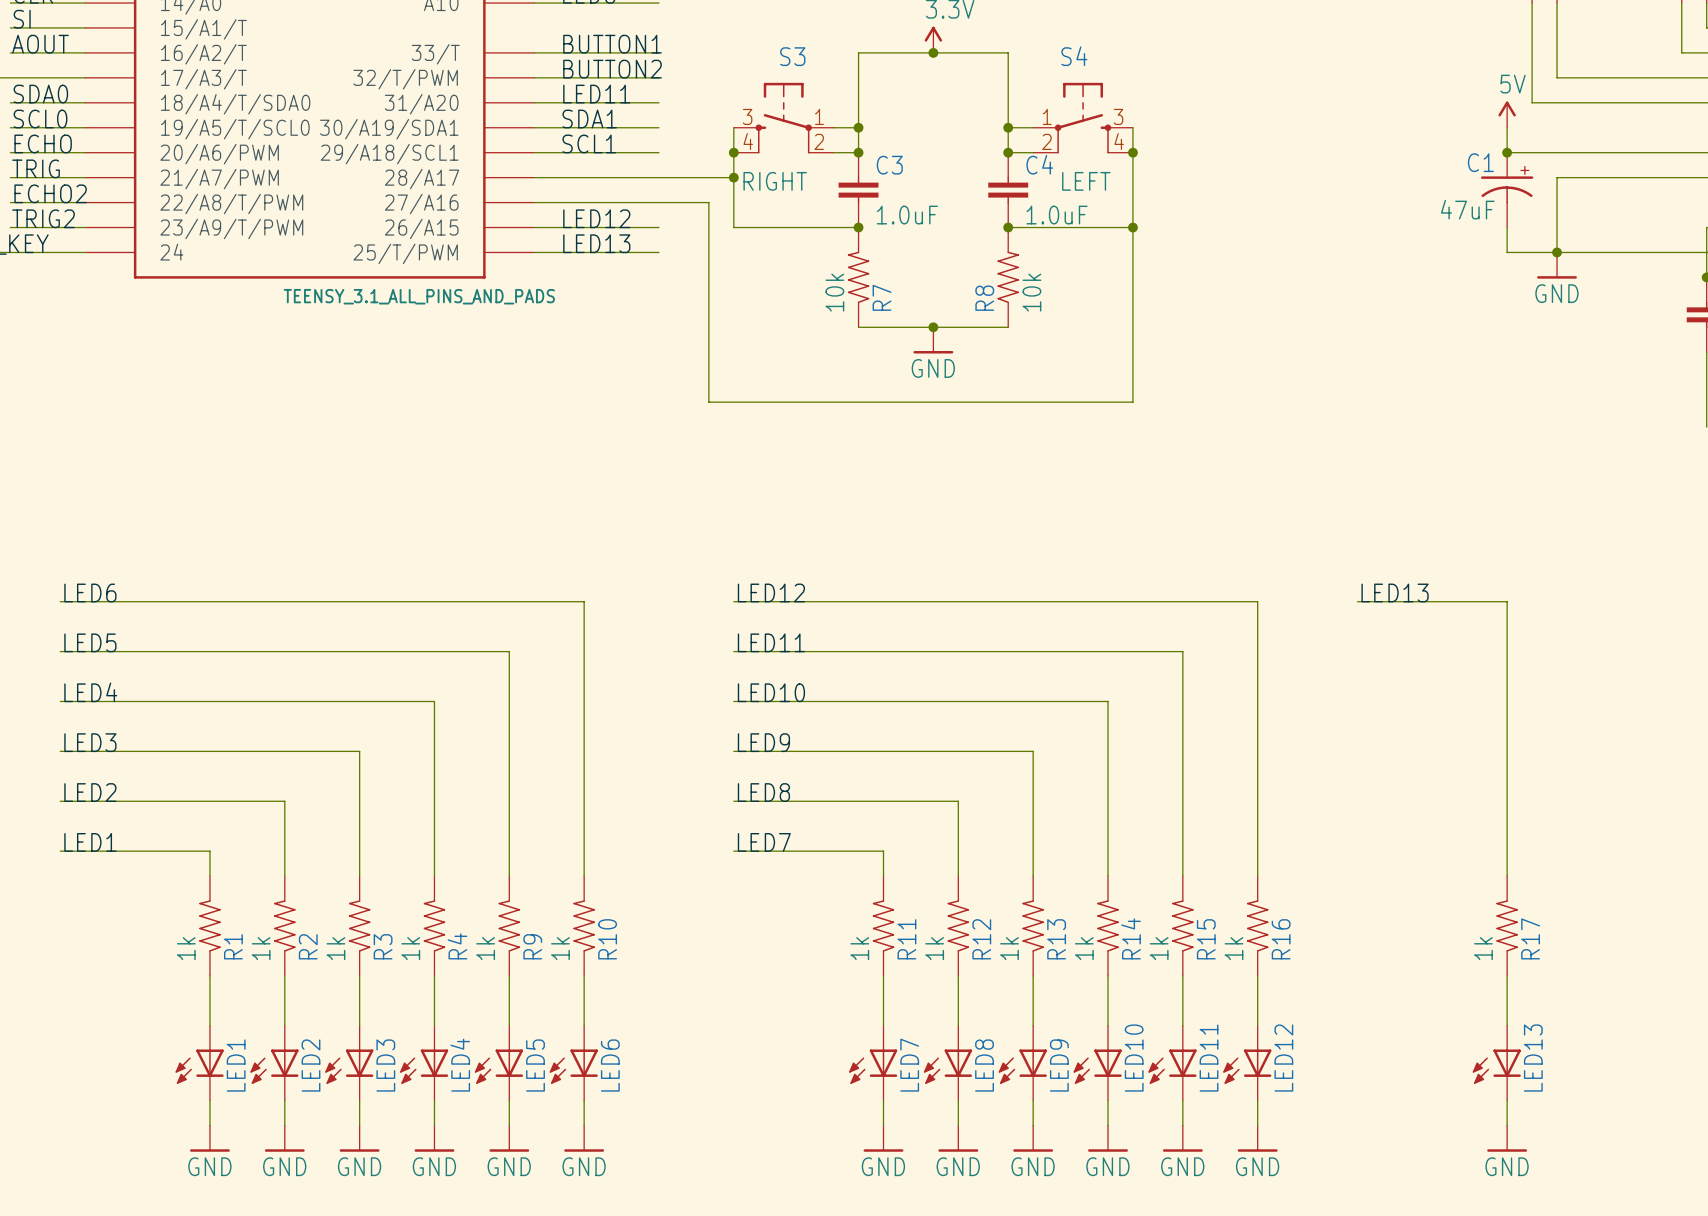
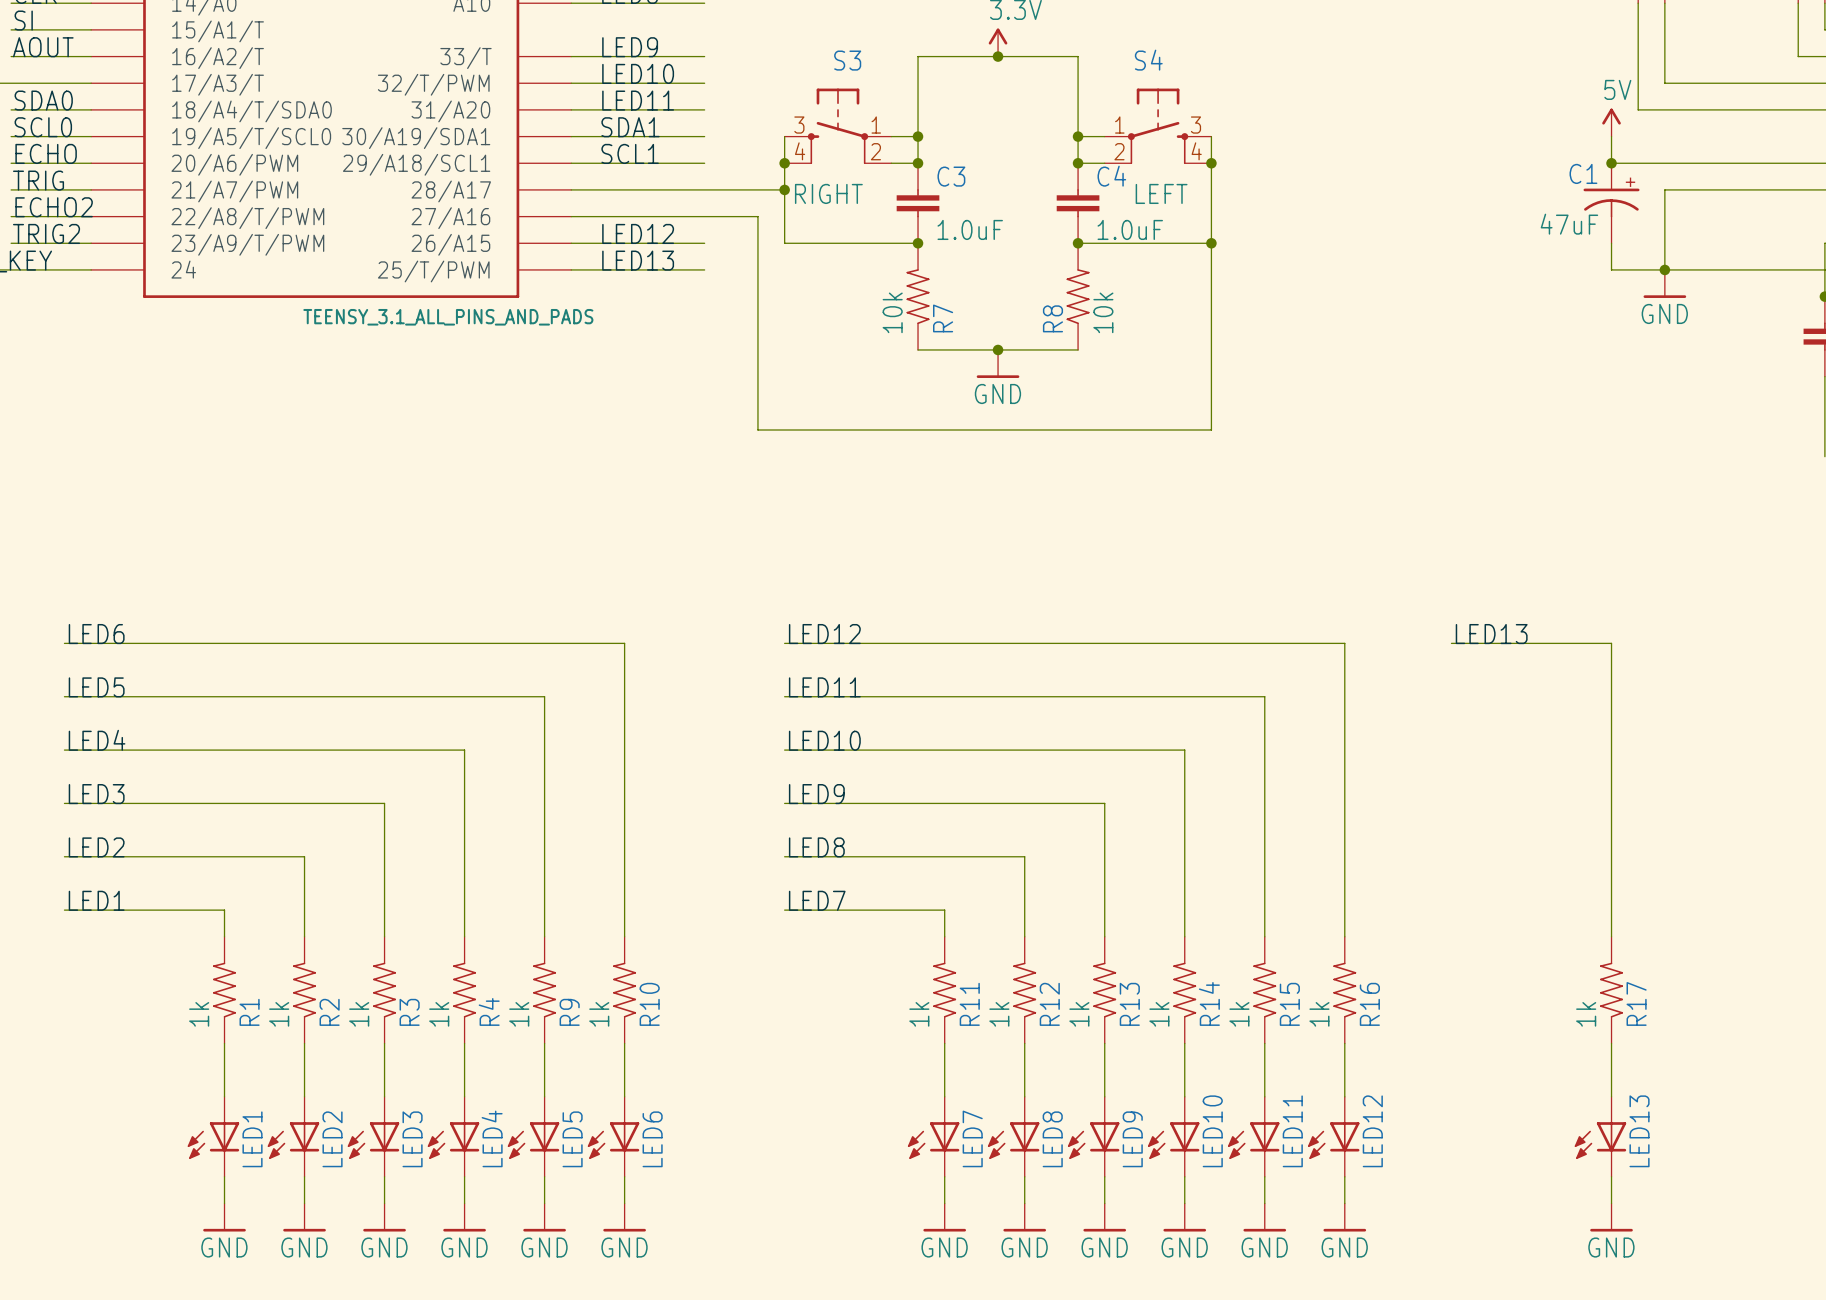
label: BUTTON1 (612, 44) -> LED9 (630, 47)
label: BUTTON2 (612, 69) -> LED10 (638, 73)

